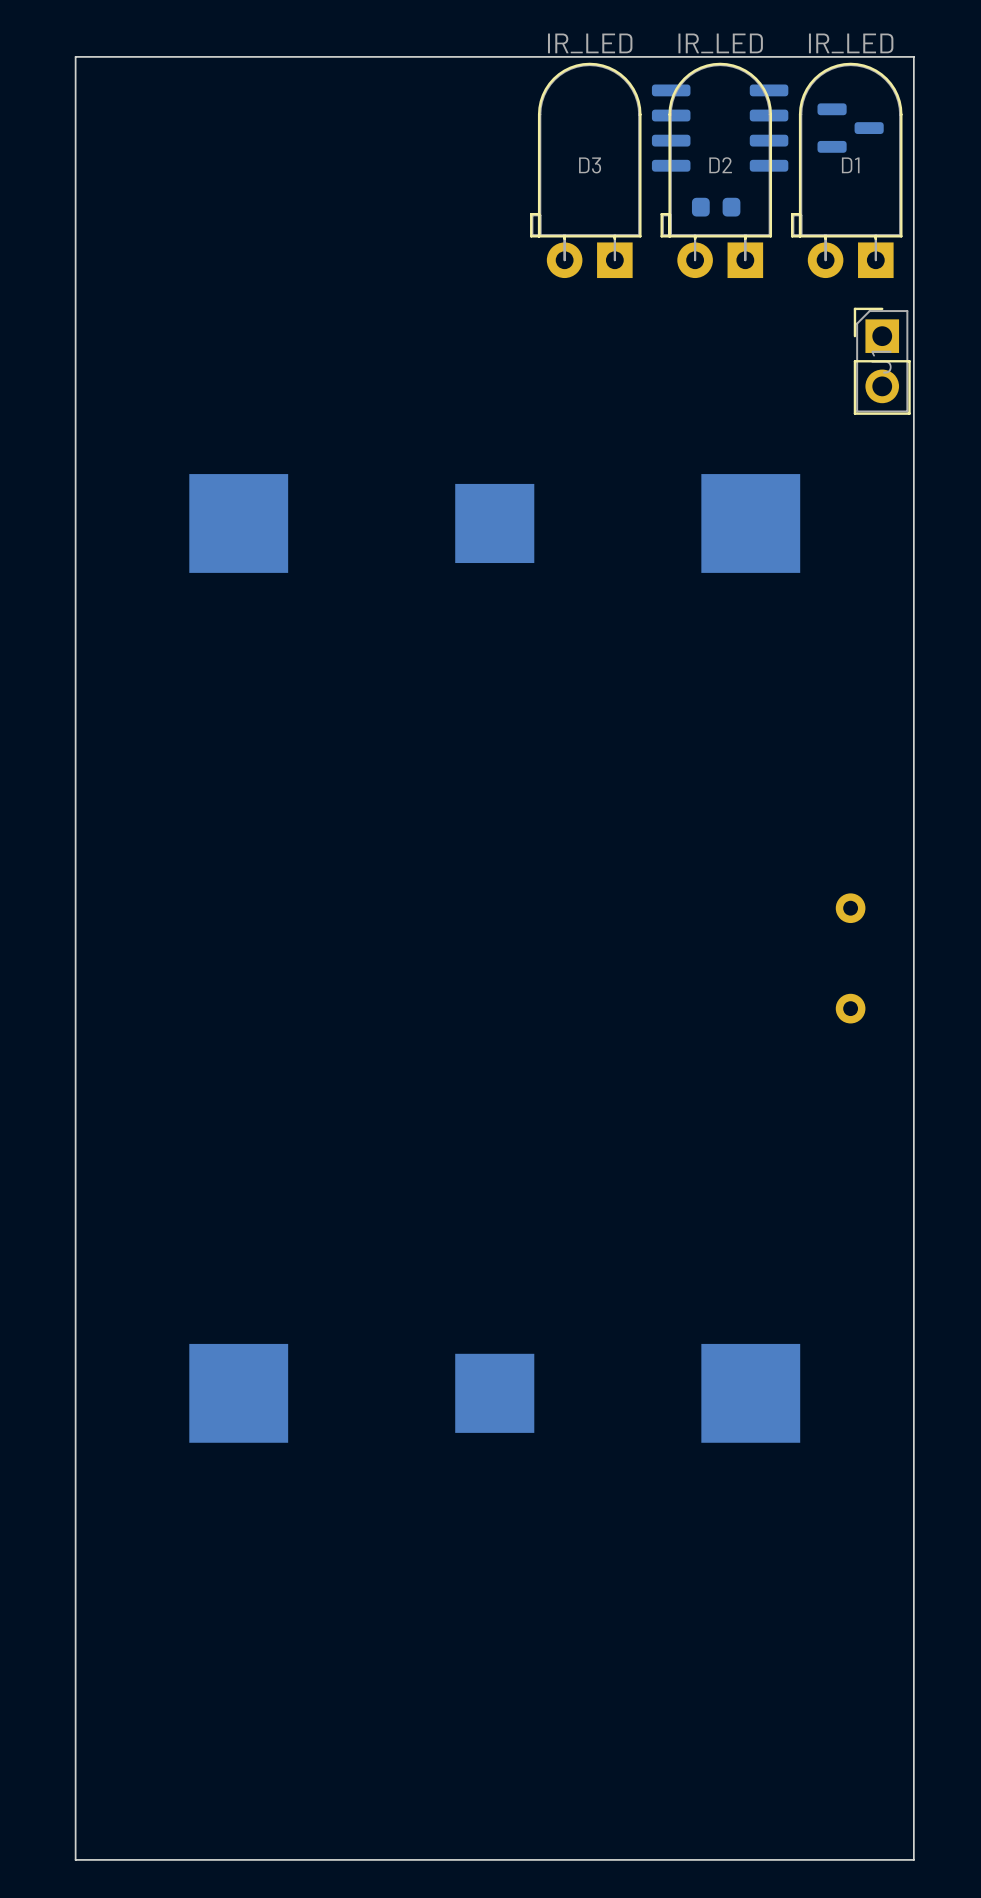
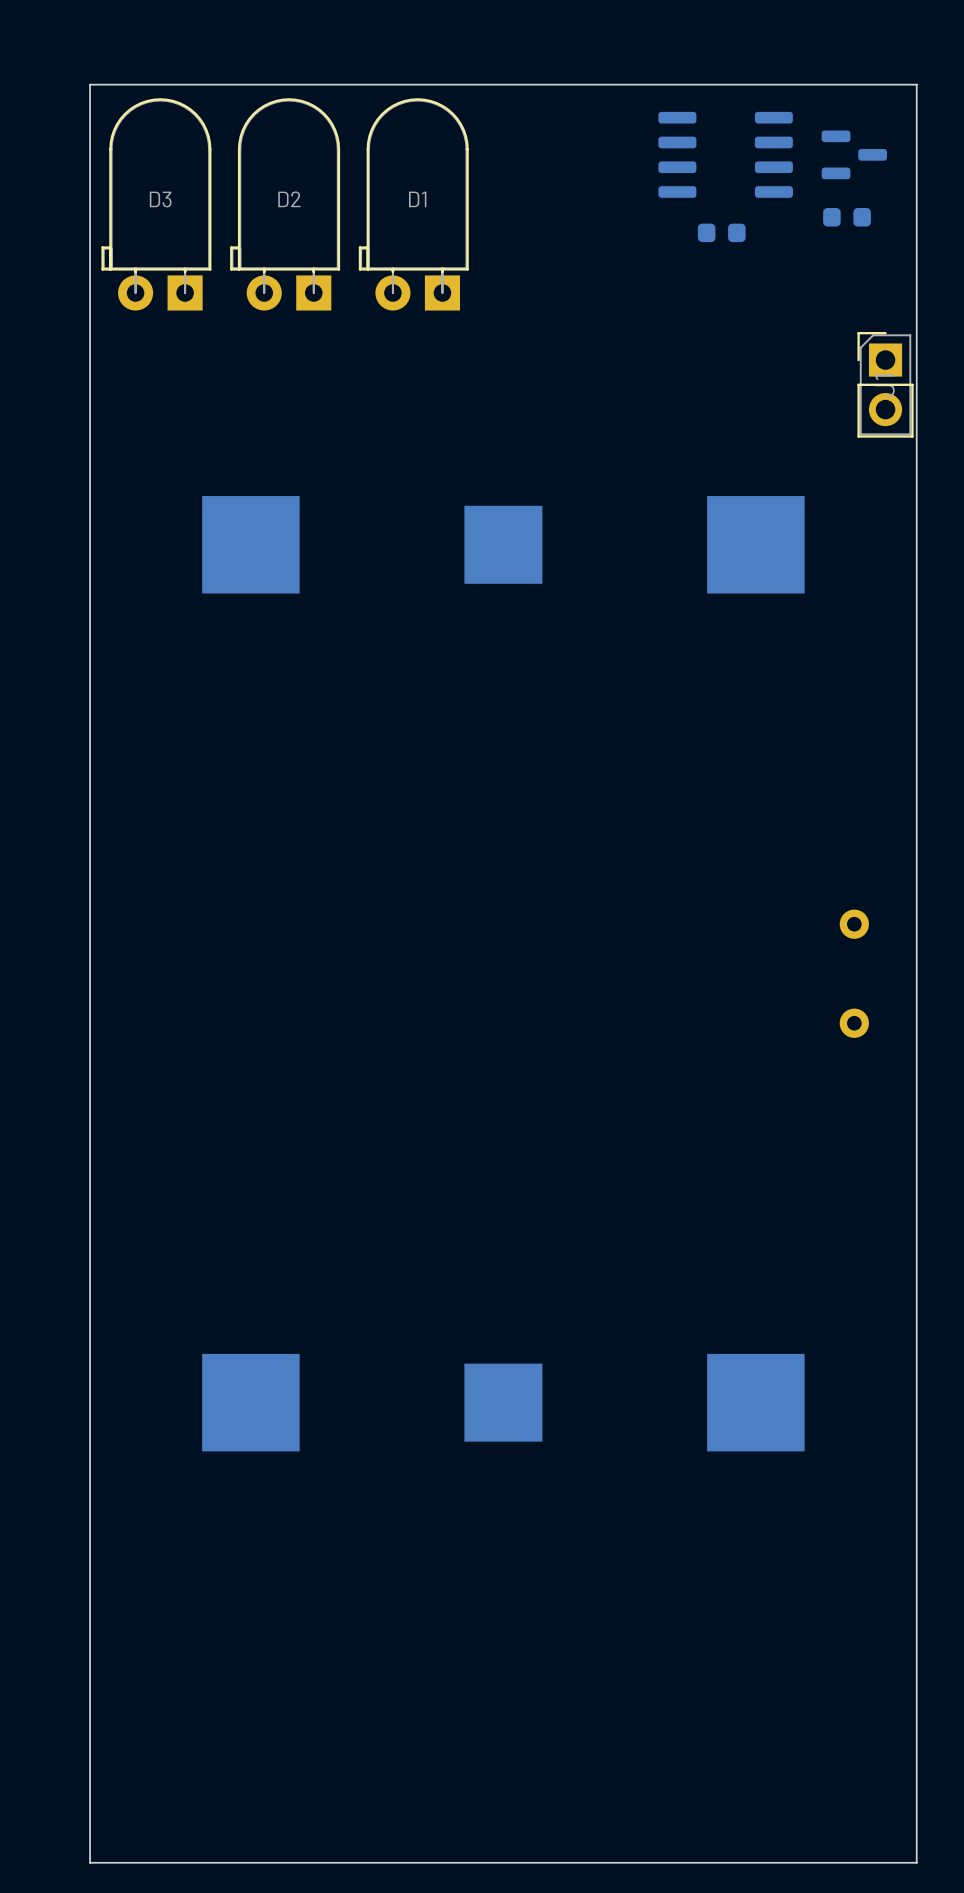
D3 value: IR_LED (590, 43) -> none
D2 value: IR_LED (720, 43) -> none
D1 value: IR_LED (851, 43) -> none
D3 position: (585, 170) -> (156, 204)
D2 position: (716, 170) -> (285, 204)
D1 position: (846, 170) -> (413, 204)
part: none -> (847, 217)

